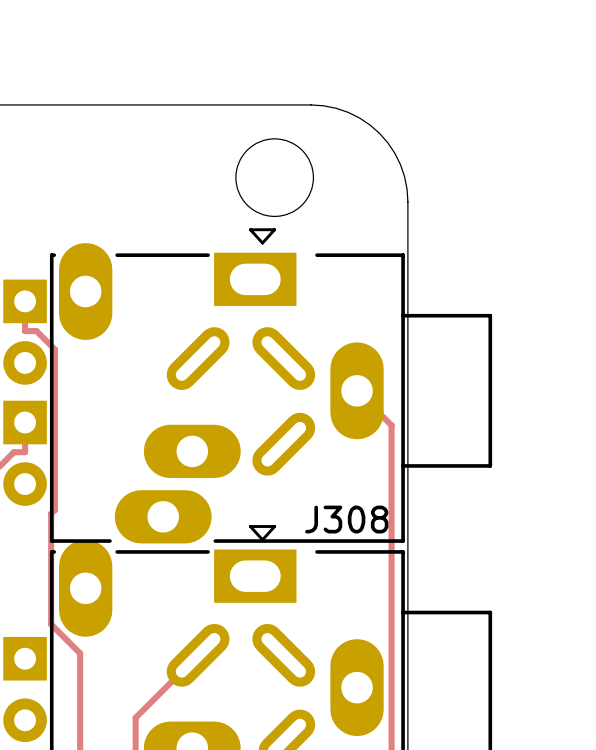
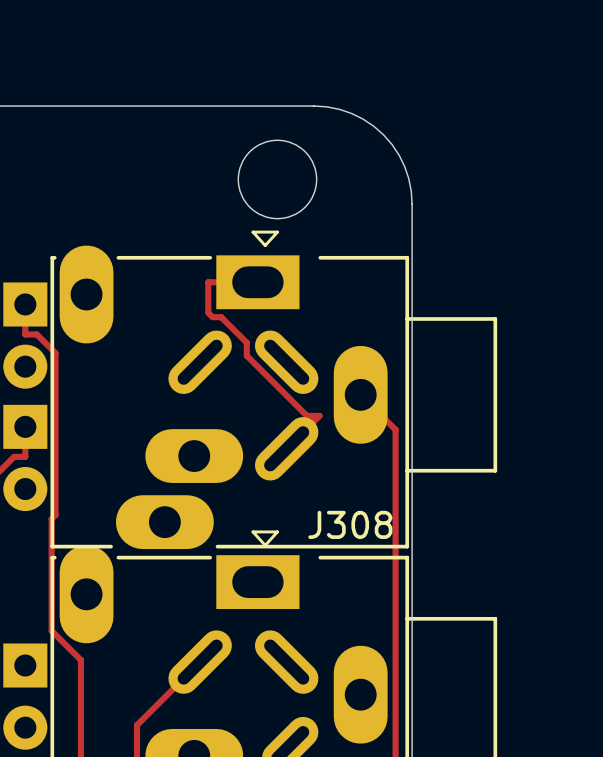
track: none -> (257, 282) (208, 282) (208, 312) (212, 317) (221, 317) (246, 342) (246, 355) (306, 415) (319, 415) (286, 448)

